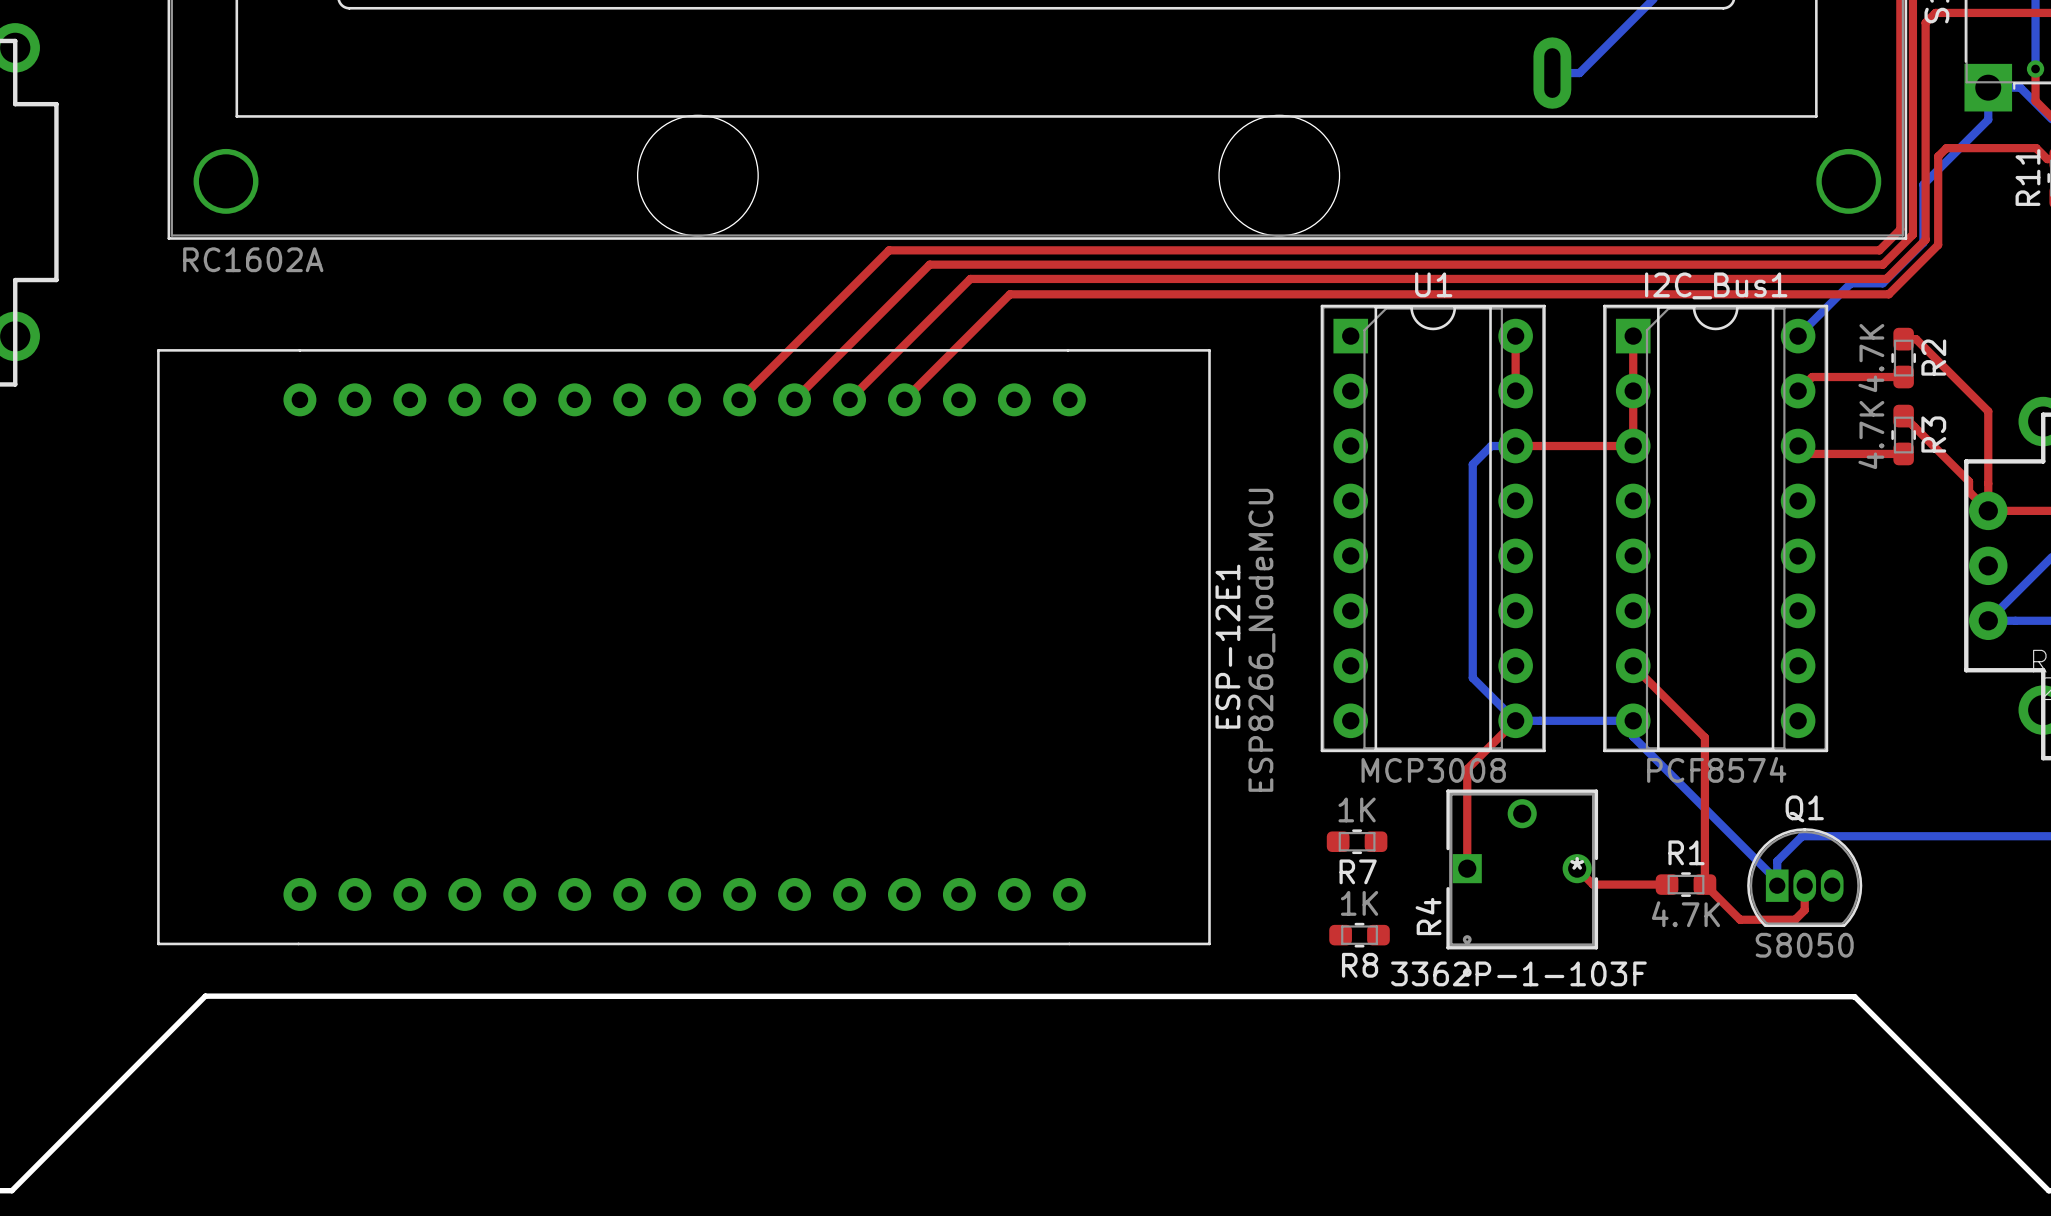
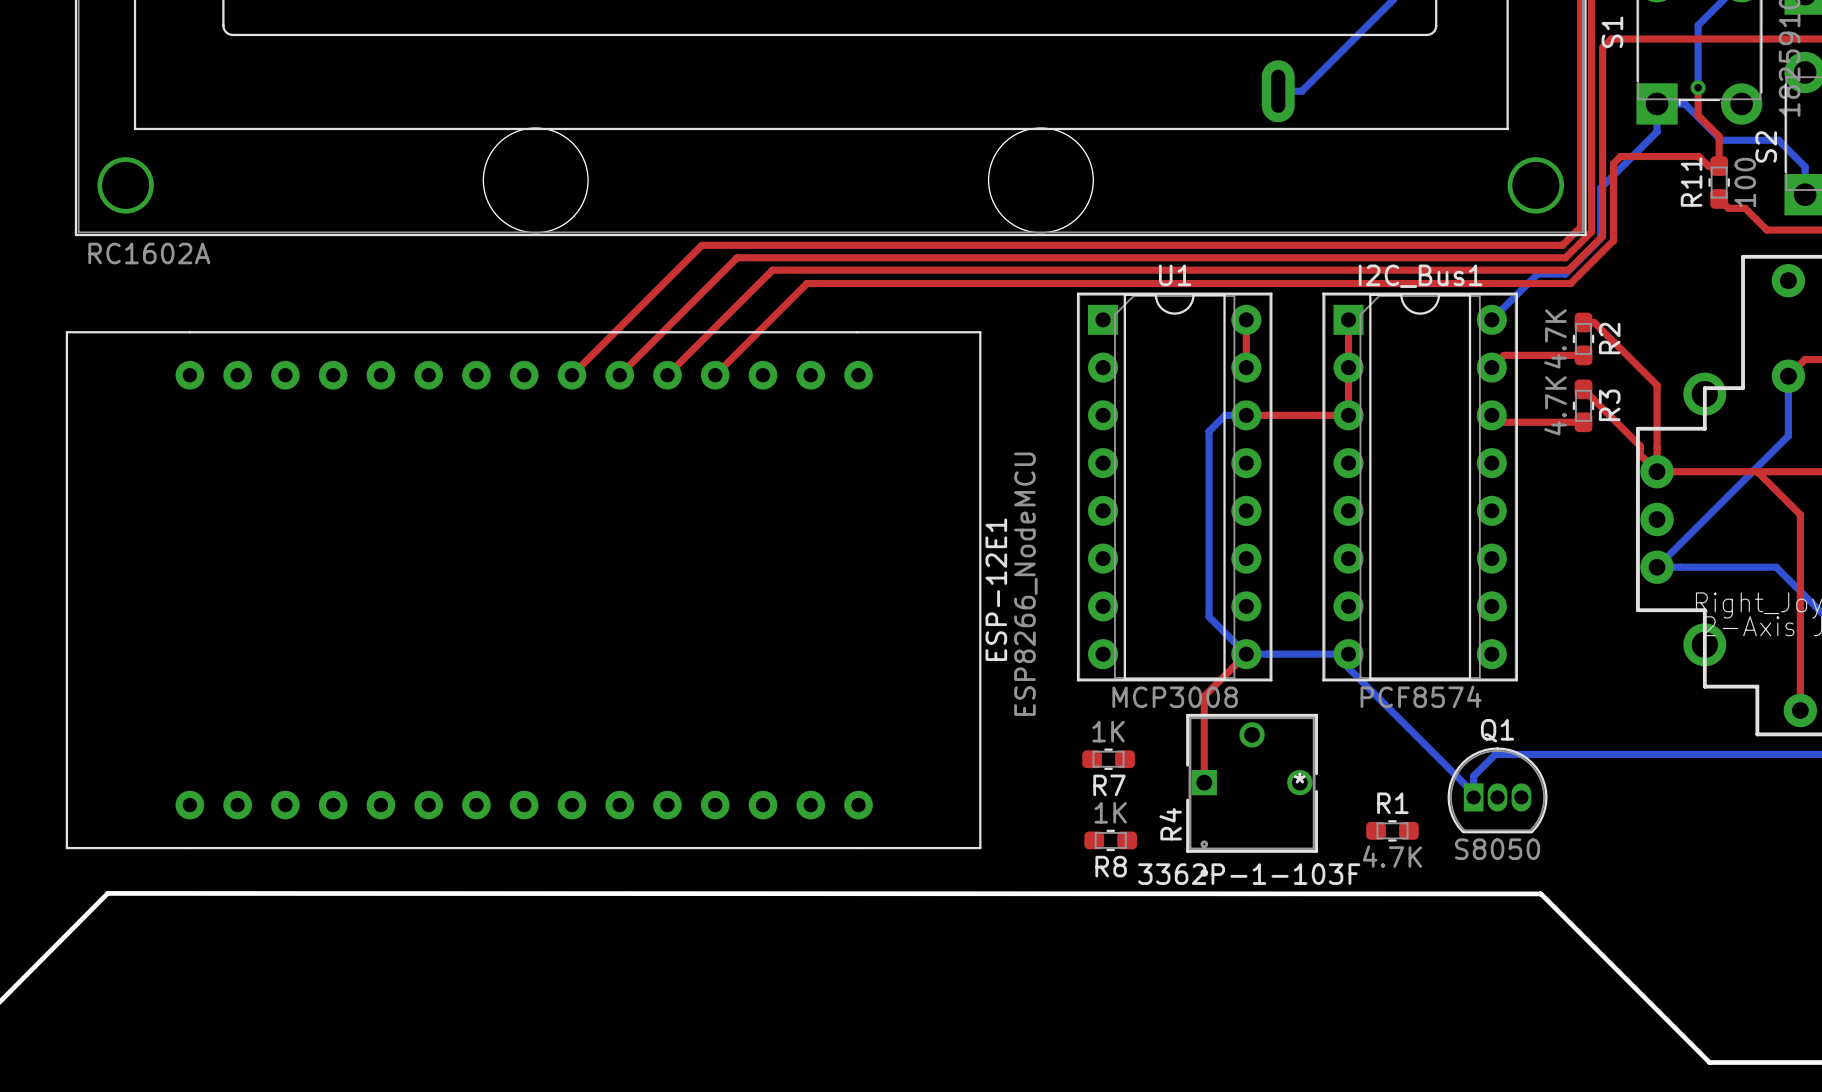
top track: (1633, 665) (1704, 737) (1704, 884) (1740, 919) (1795, 919) (1804, 910) (1804, 885) -> none
top track: (1577, 868) (1593, 884) (1667, 884) -> none
R1 position: (1686, 884) -> (1392, 830)

